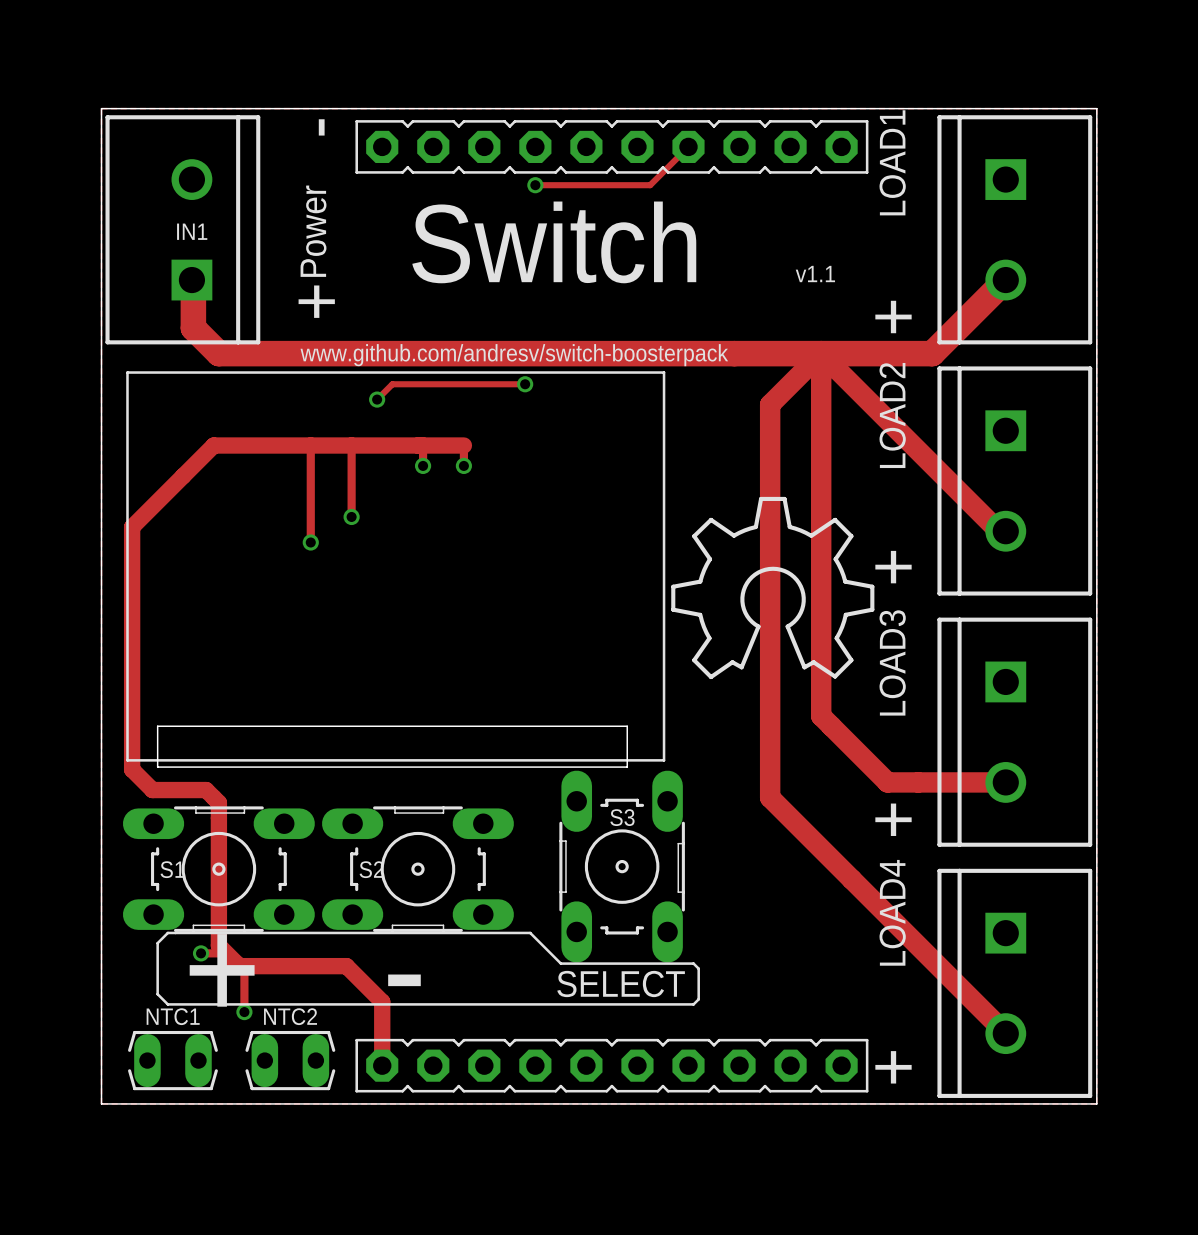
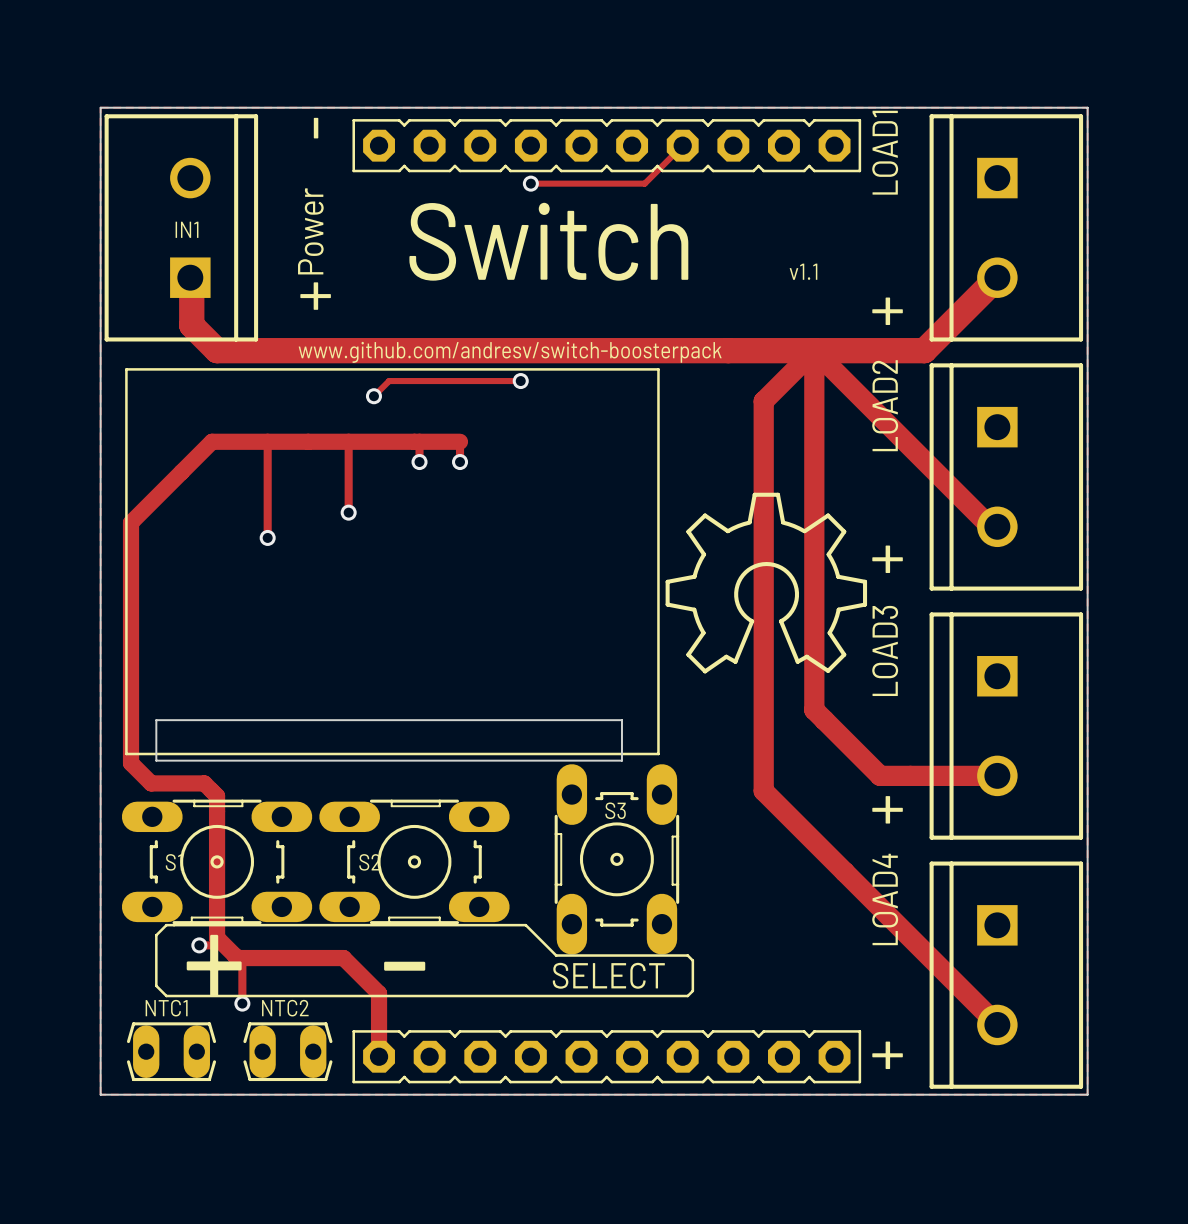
track: (310, 445) (310, 542) -> (267, 441) (267, 537)
via position: (310, 542) -> (267, 537)

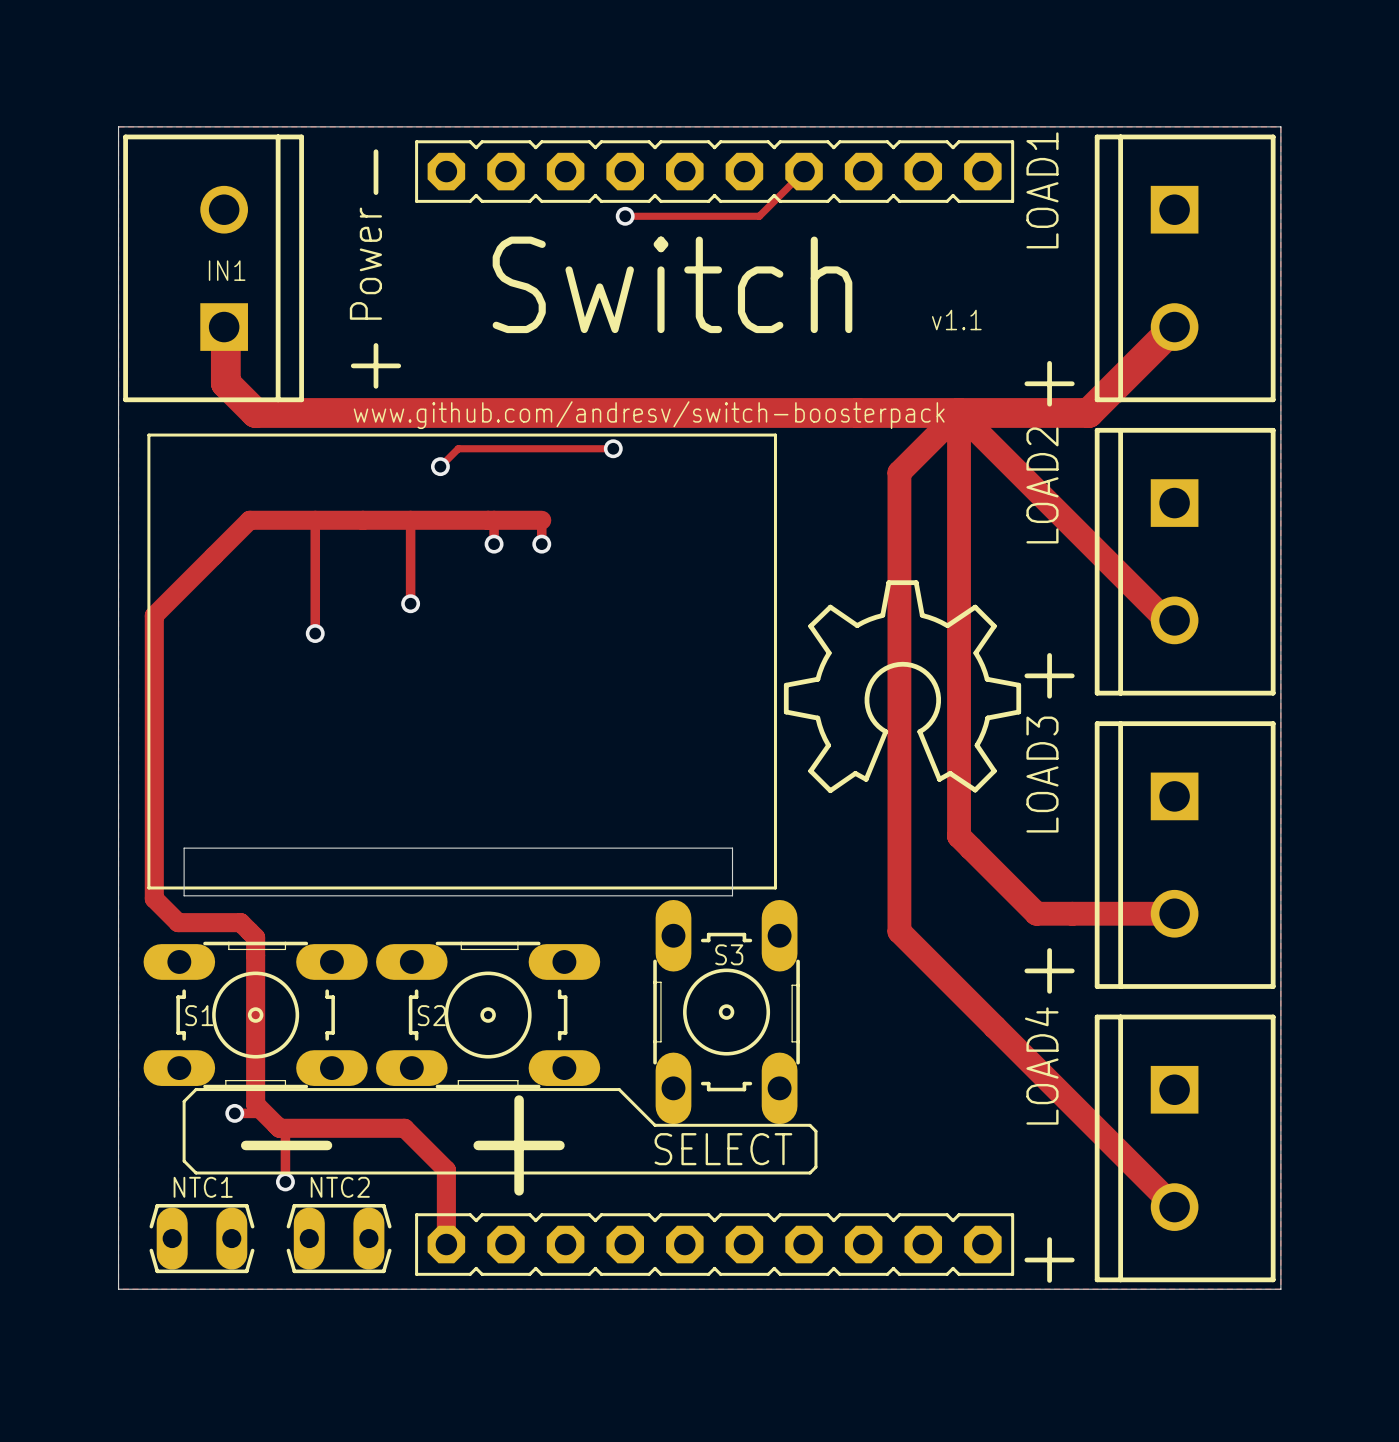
text: + (214, 965) -> - (286, 1145)
text: - (404, 966) -> + (519, 1145)

